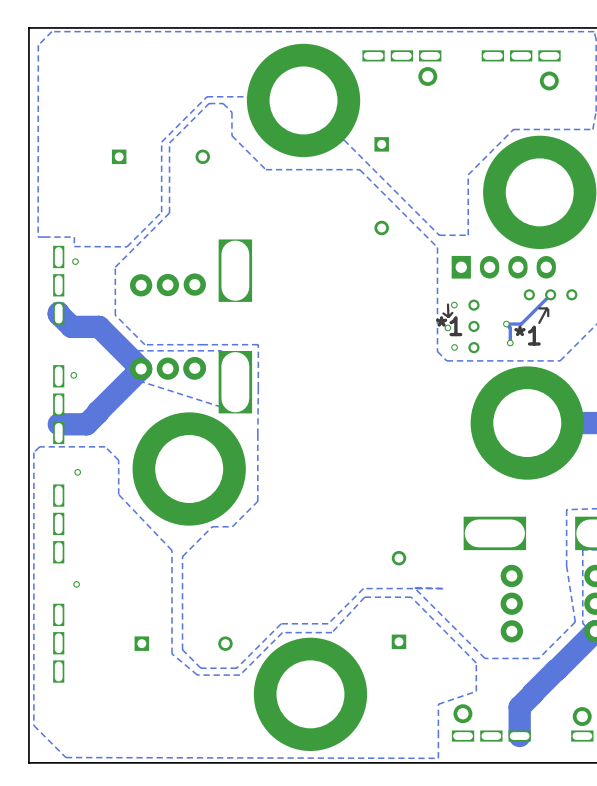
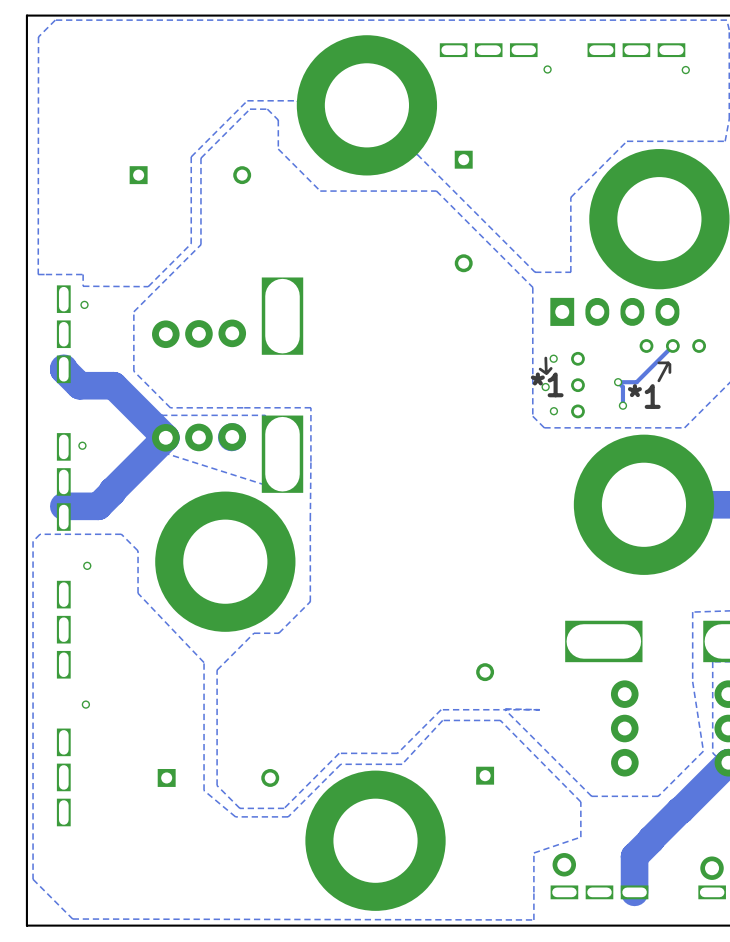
via: none -> (547, 69)
via: none -> (685, 70)
via: (427, 76) -> none
via: (549, 80) -> none

